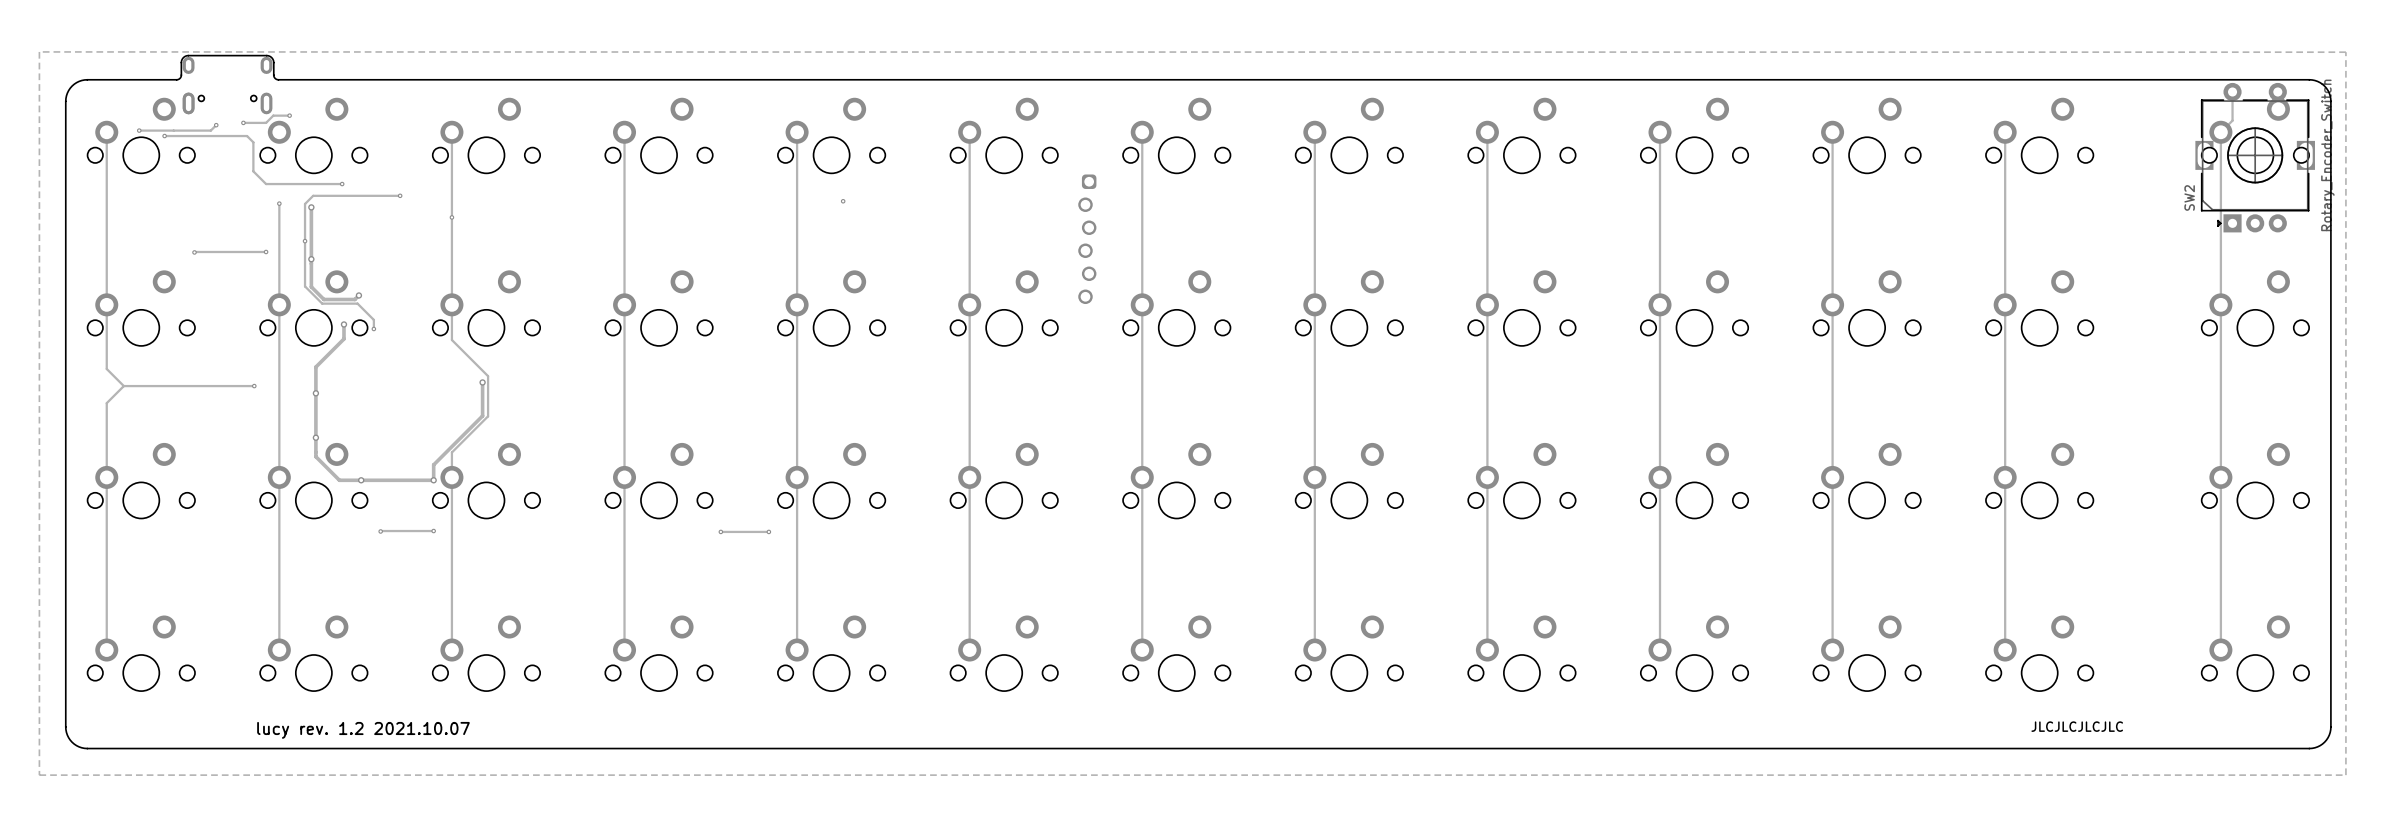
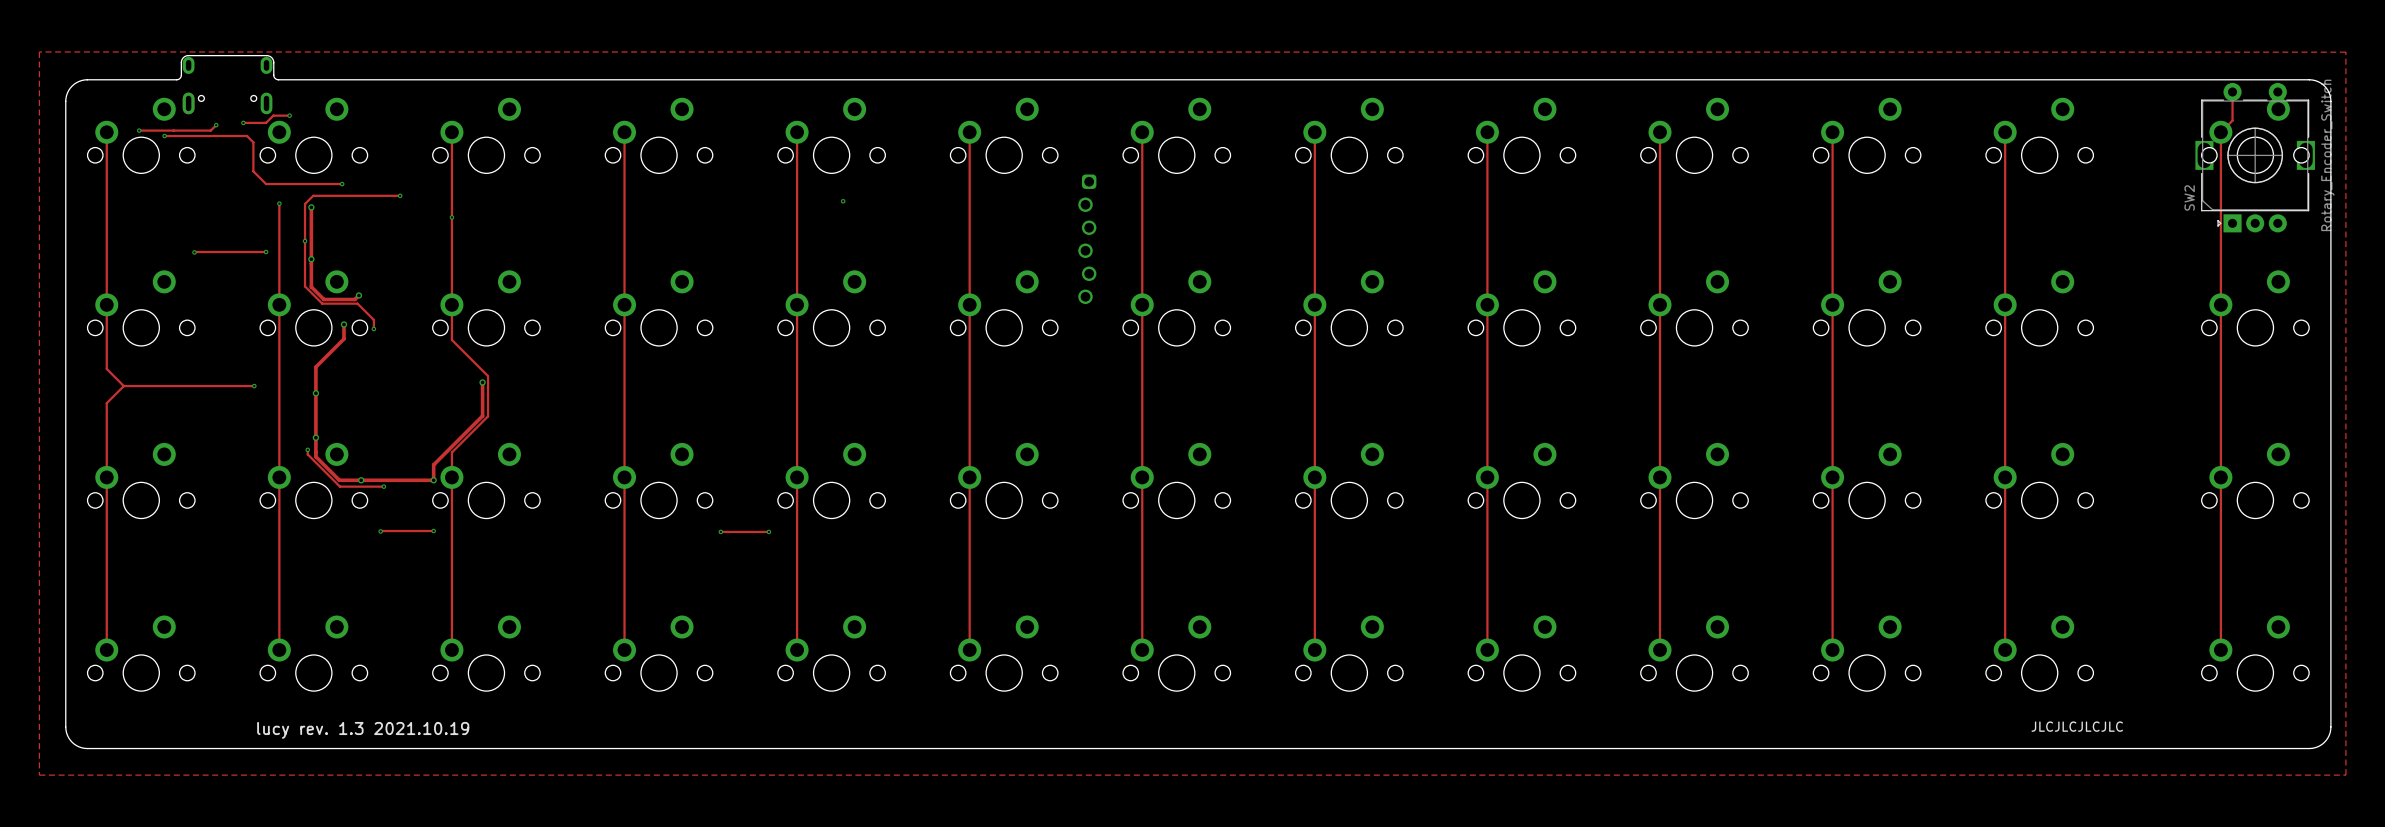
track: none -> (307, 449) (307, 454) (339, 486) (383, 486)
via: none -> (307, 449)
via: none -> (383, 486)
text: lucy rev. 1.2 2021.10.07 (363, 730) -> lucy rev. 1.3 2021.10.19 (363, 730)

